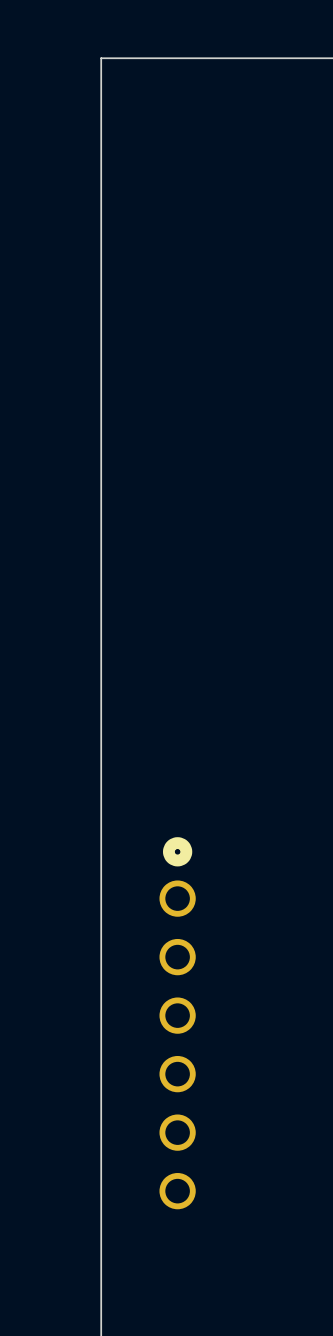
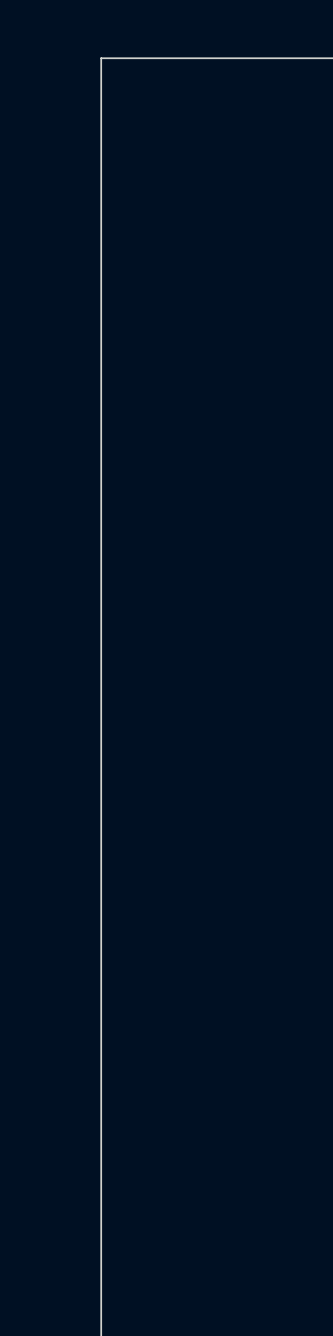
part: (177, 1023) -> none

